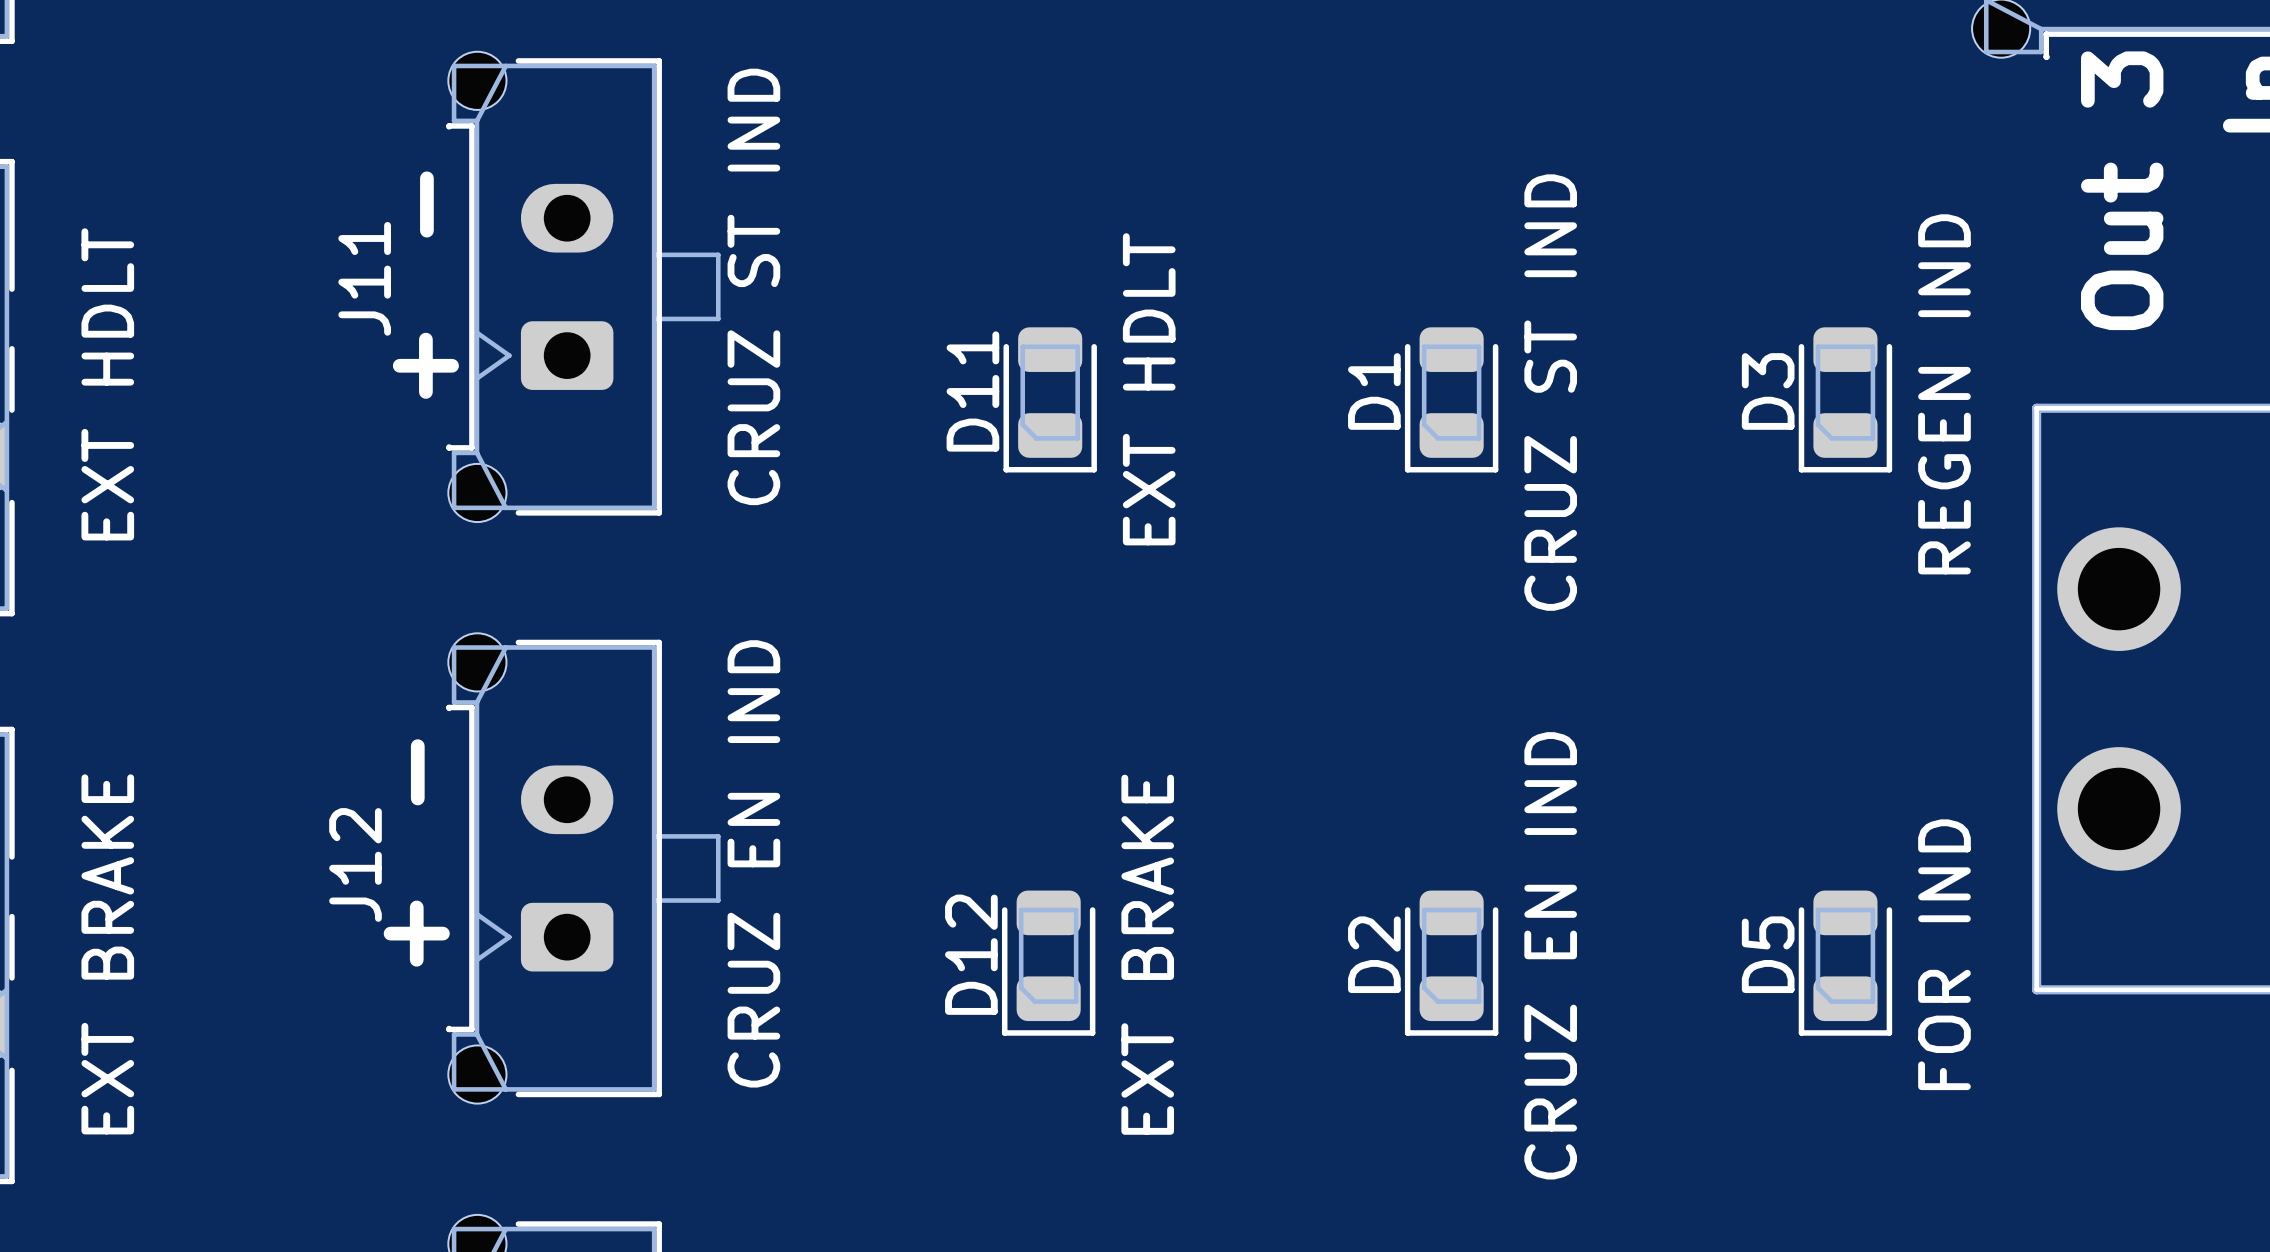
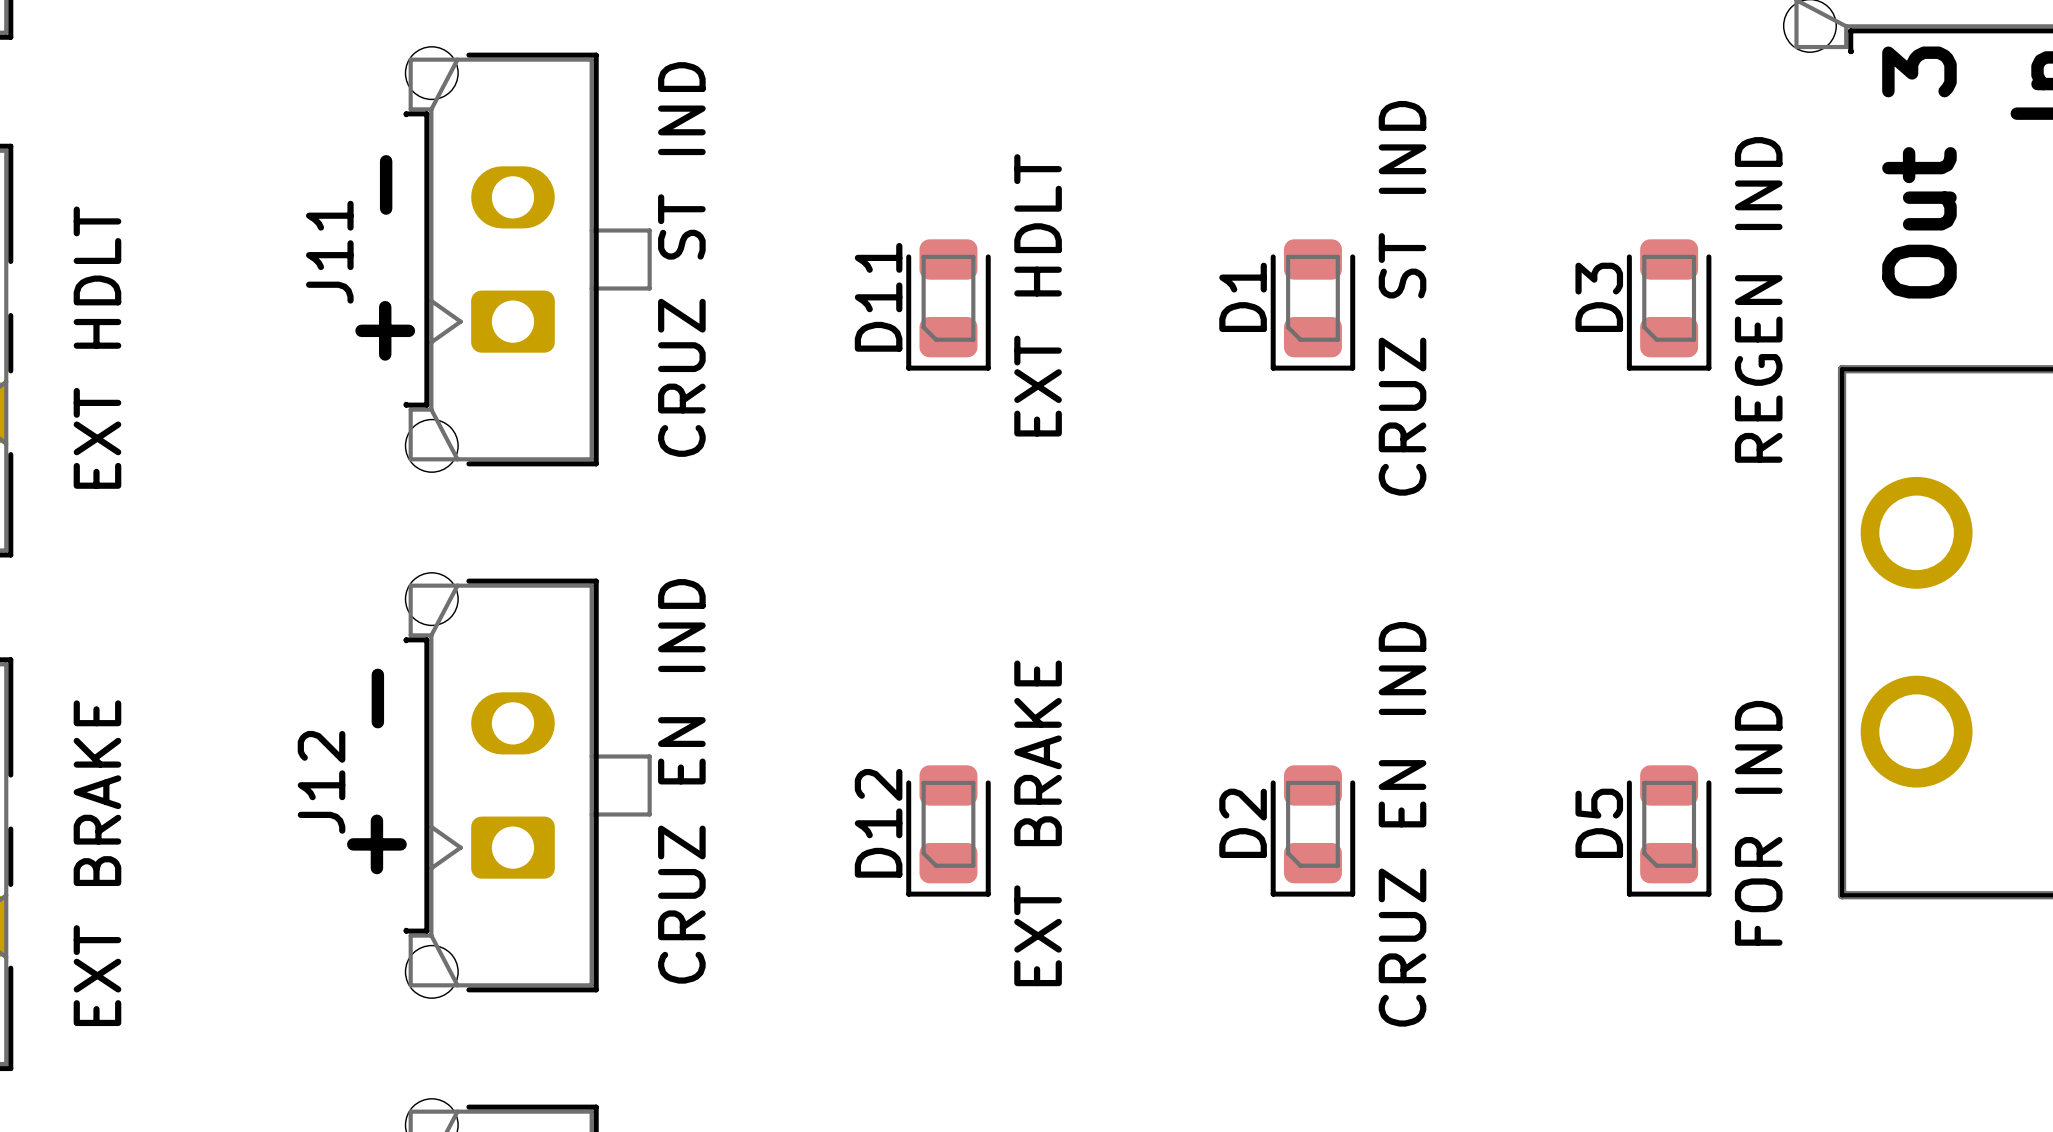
D11 position: (1050, 399) -> (948, 304)
D1 position: (1451, 399) -> (1312, 304)
D3 position: (1845, 399) -> (1669, 304)
D12 position: (1048, 963) -> (948, 830)
D2 position: (1451, 963) -> (1312, 830)
D5 position: (1845, 963) -> (1669, 830)

